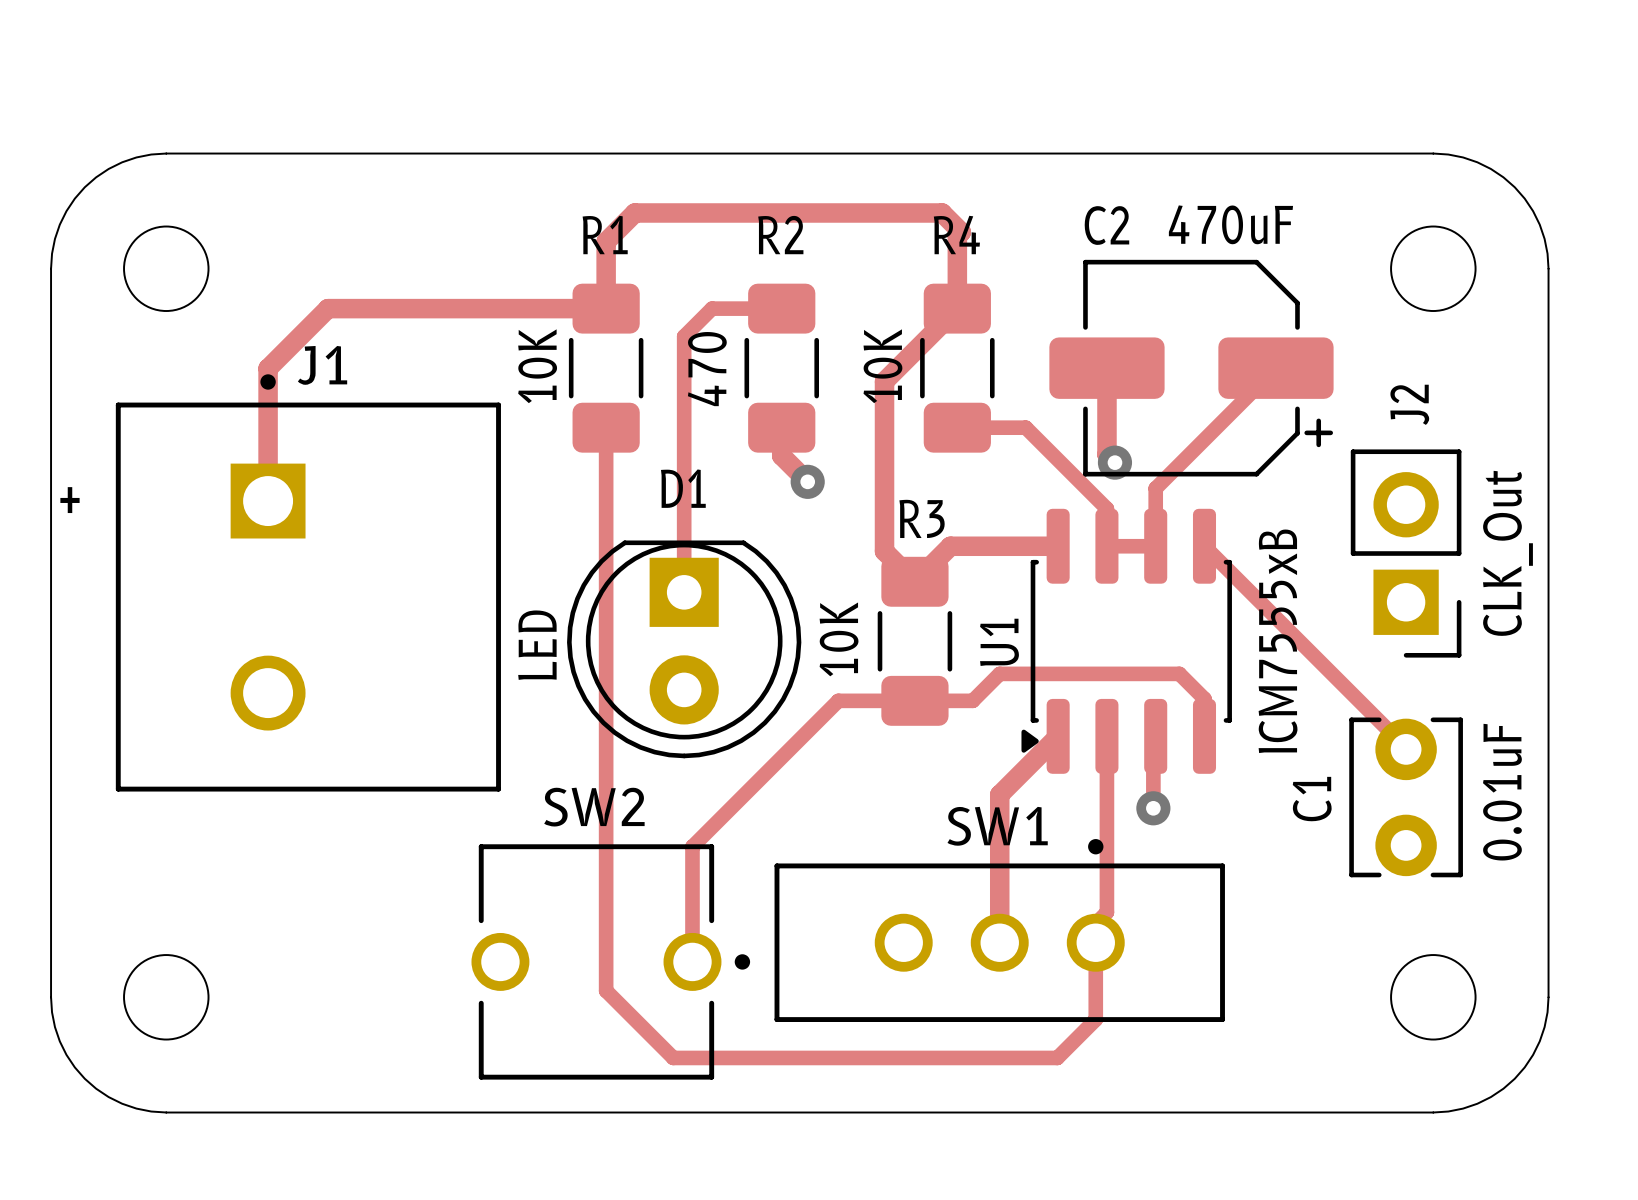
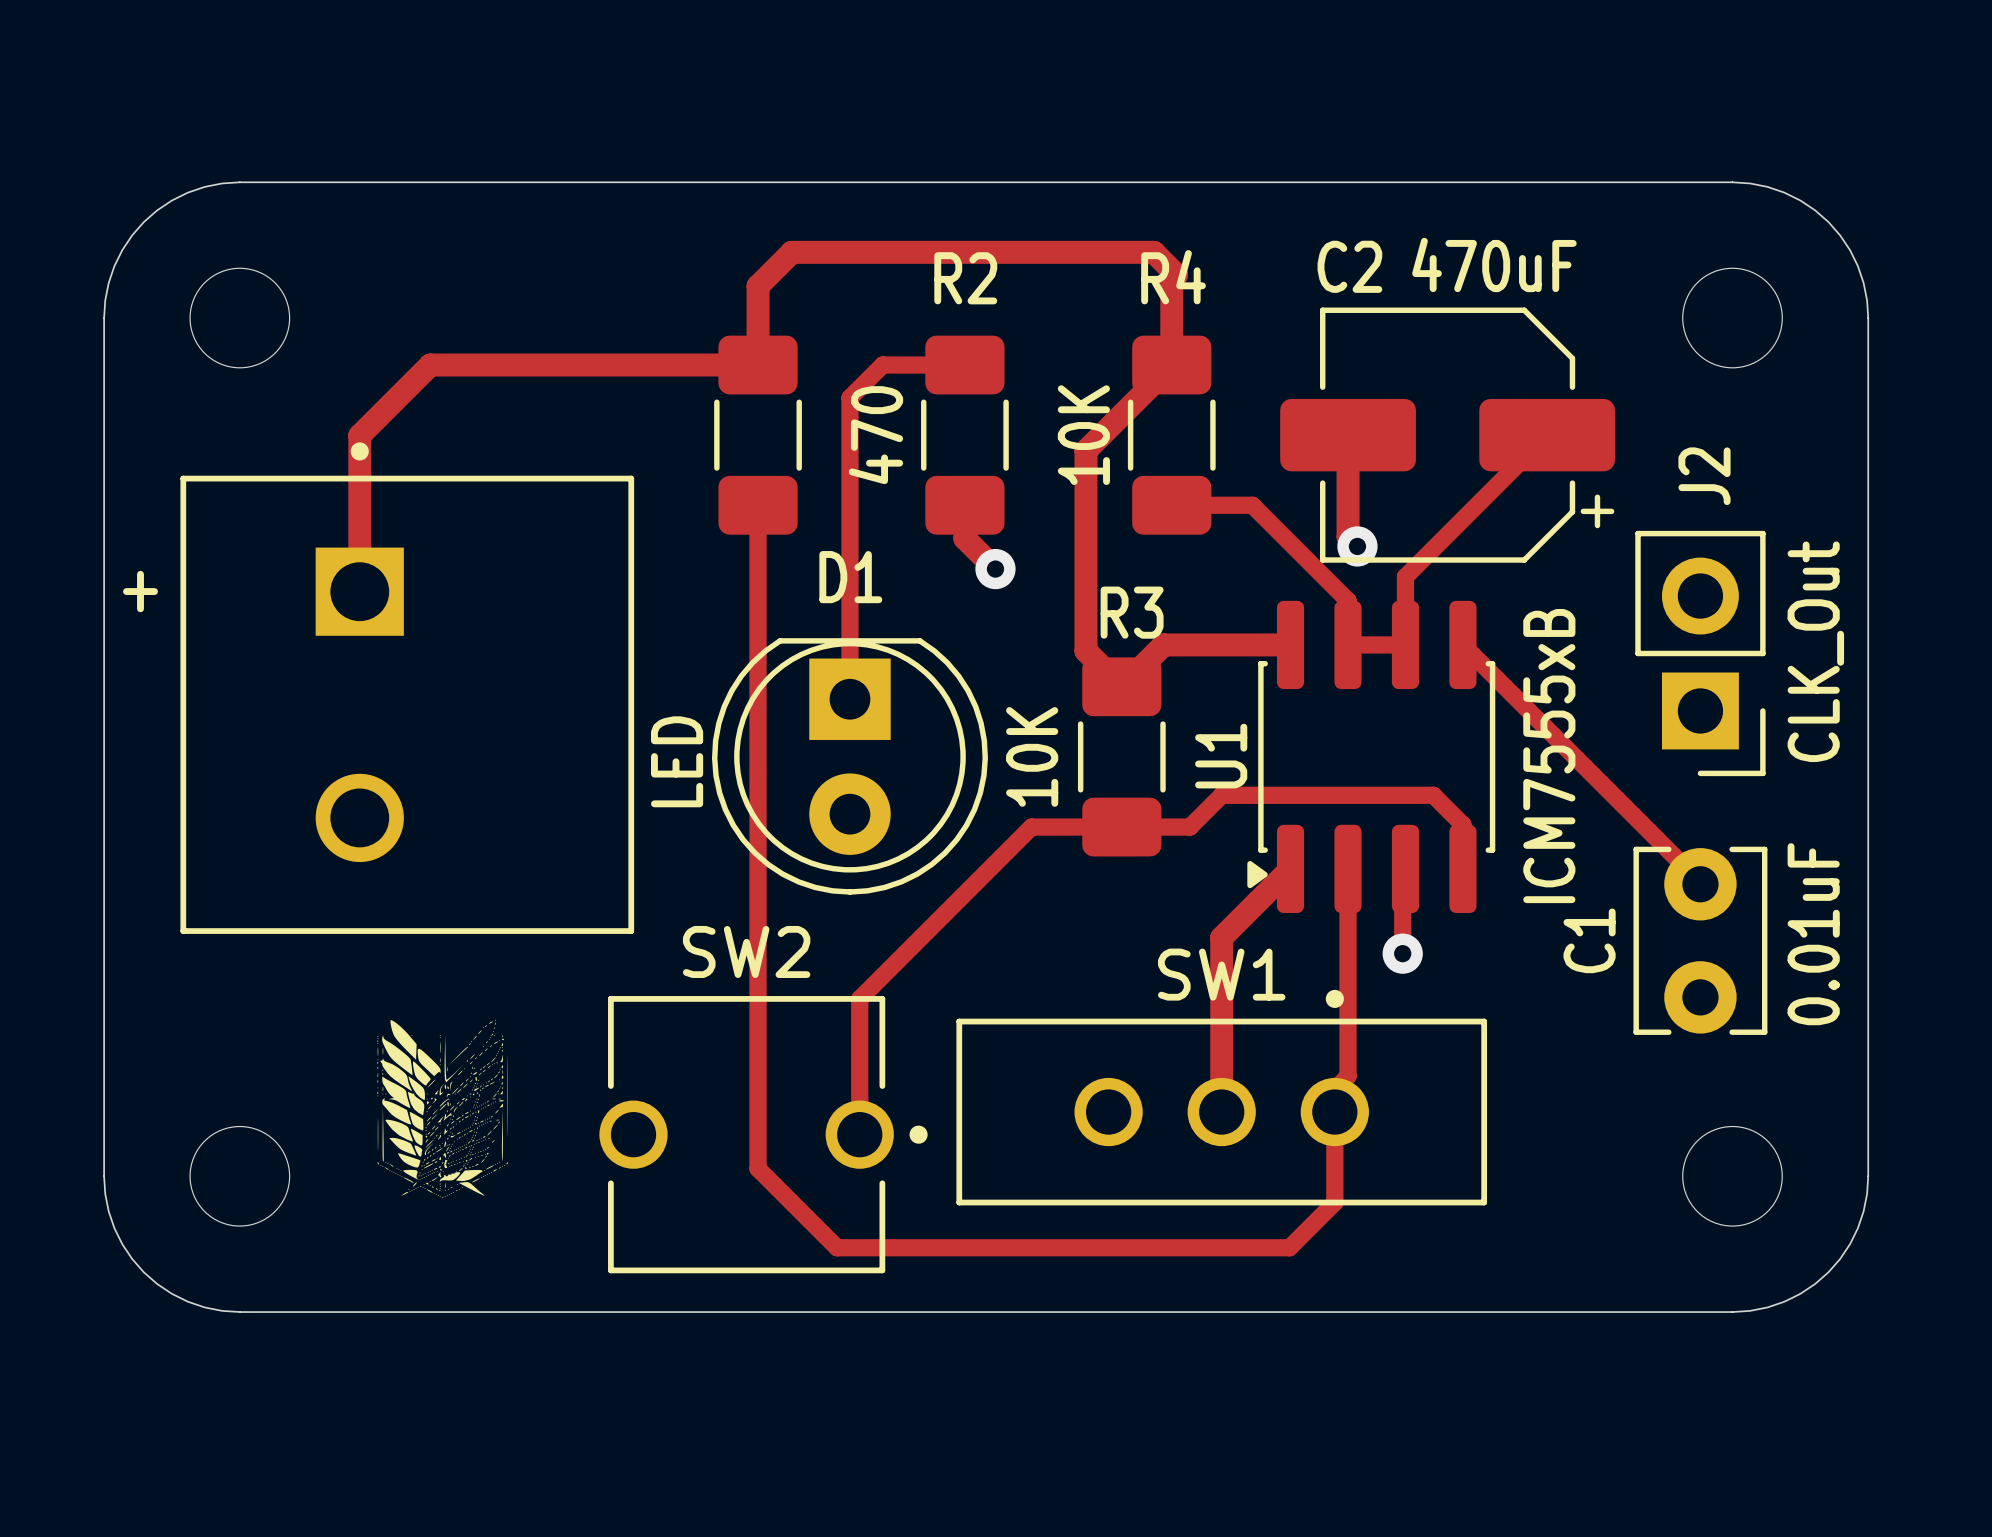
R1 name: R1 (605, 235) -> none
J1 name: J1 (322, 365) -> none
R1 value: 10K (537, 366) -> none
drawing: none -> [377, 1020, 508, 1199]

